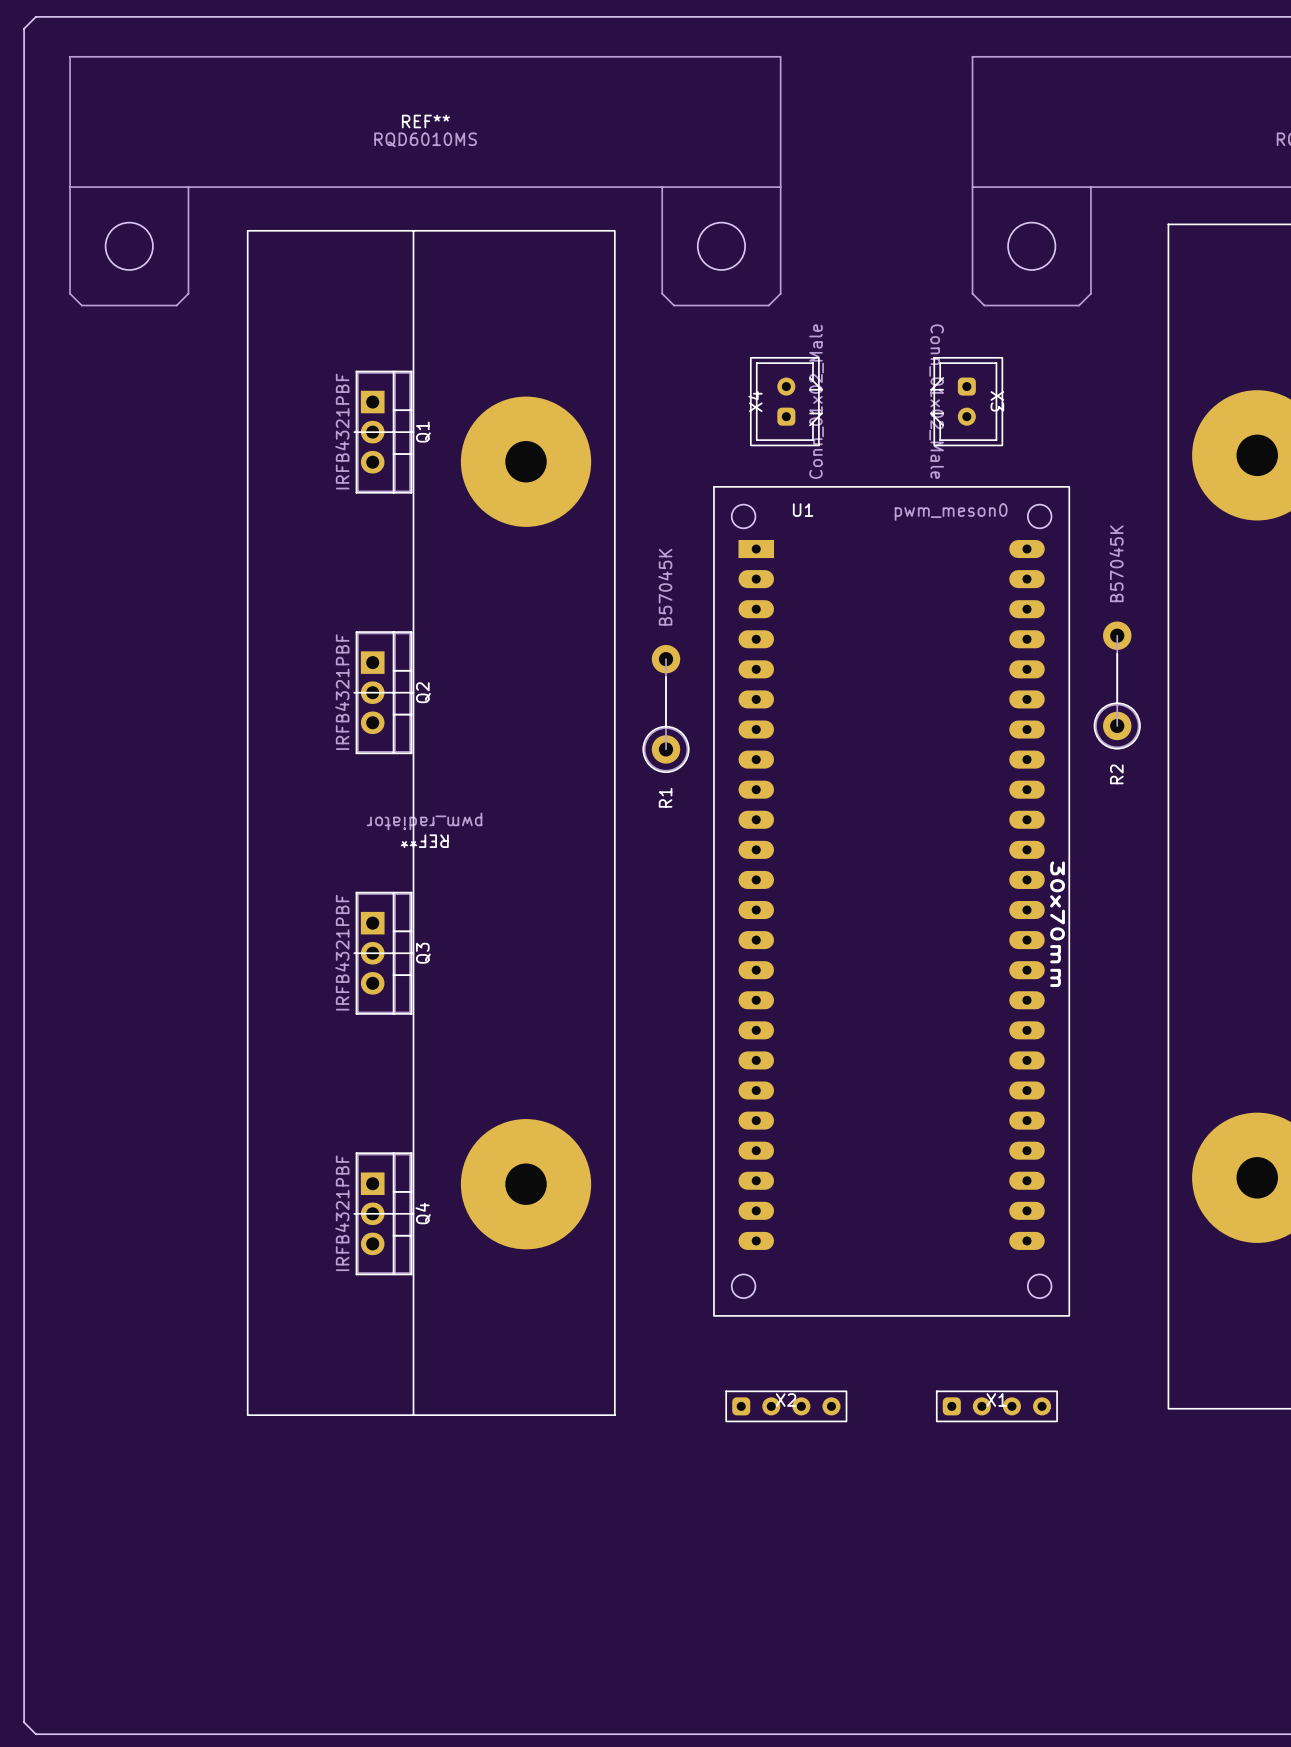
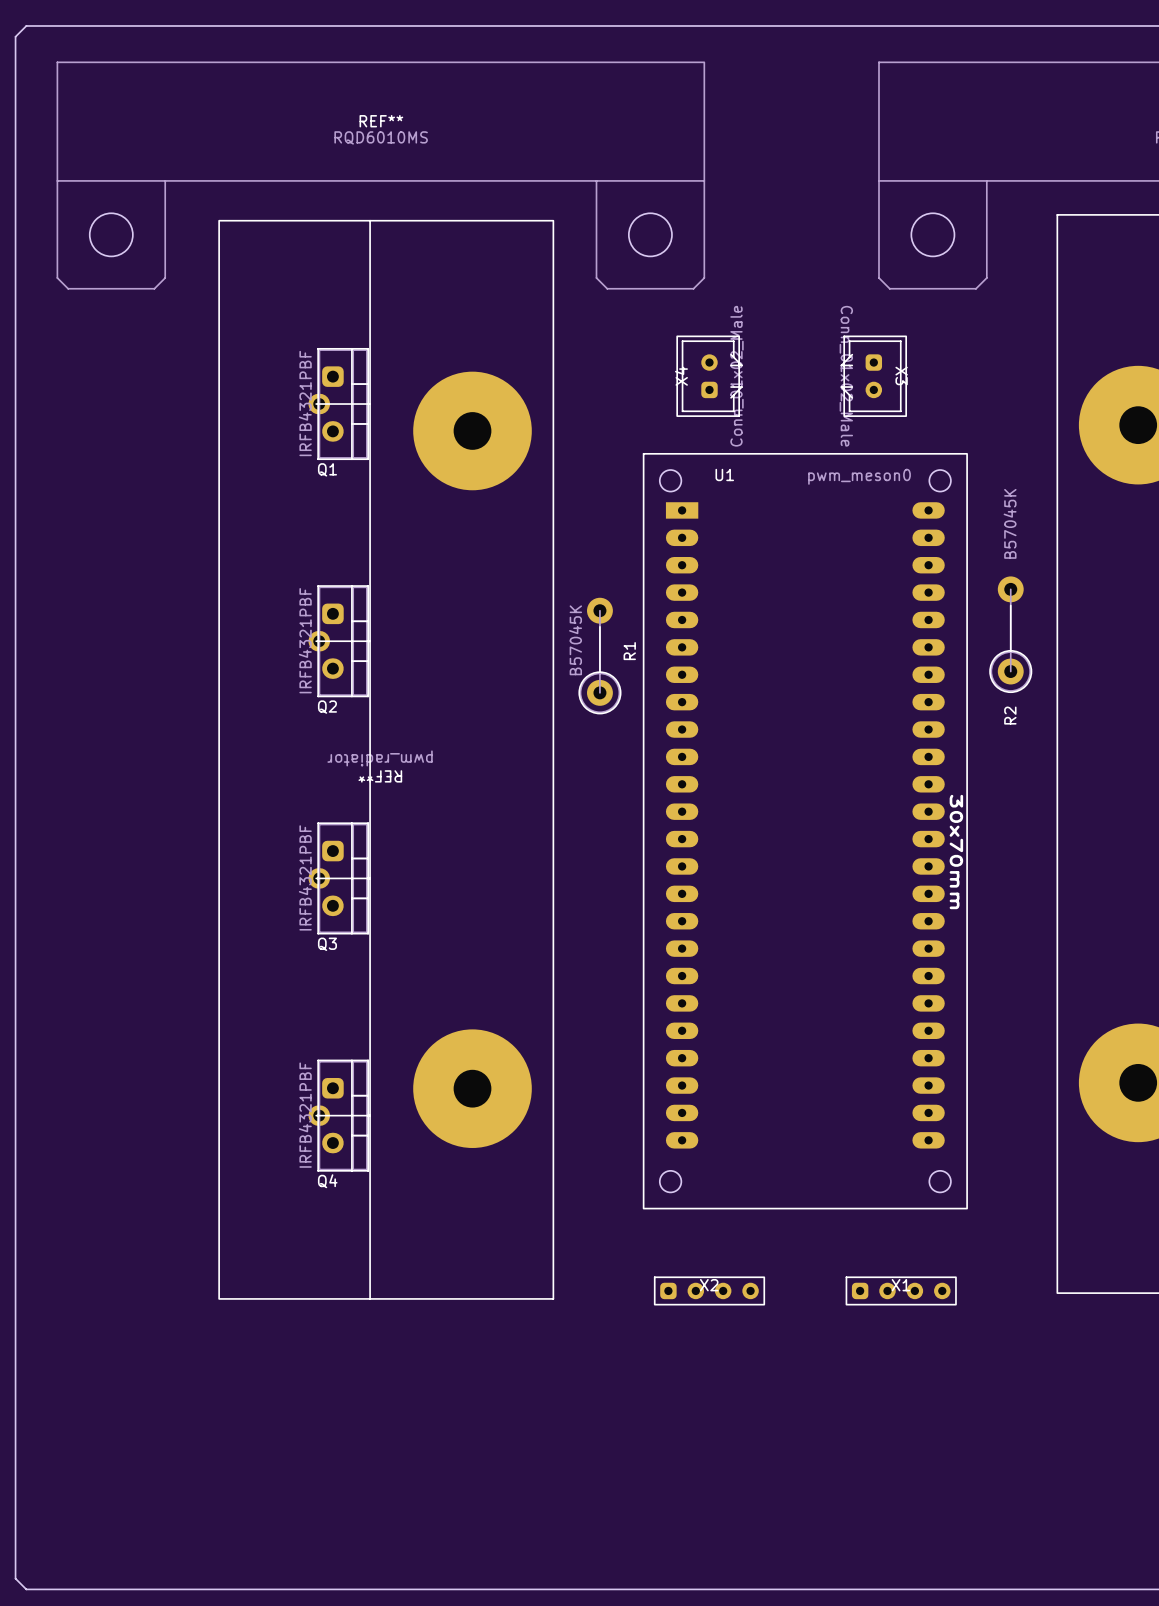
Q1 footprint: [355, 370, 413, 494] -> [308, 348, 369, 460]
Q1 name position: Q1 (423, 432) -> Q1 (327, 469)
R1 value position: B57045K (665, 587) -> B57045K (575, 640)
Q2 footprint: [355, 631, 413, 755] -> [308, 585, 369, 698]
Q2 name position: Q2 (423, 692) -> Q2 (327, 707)
R1 name position: R1 (665, 797) -> R1 (629, 651)
Q3 footprint: [355, 891, 413, 1015] -> [308, 822, 369, 935]
Q3 name position: Q3 (423, 953) -> Q3 (327, 944)
Q4 footprint: [355, 1152, 413, 1276] -> [308, 1059, 369, 1172]
Q4 name position: Q4 (423, 1213) -> Q4 (327, 1181)

